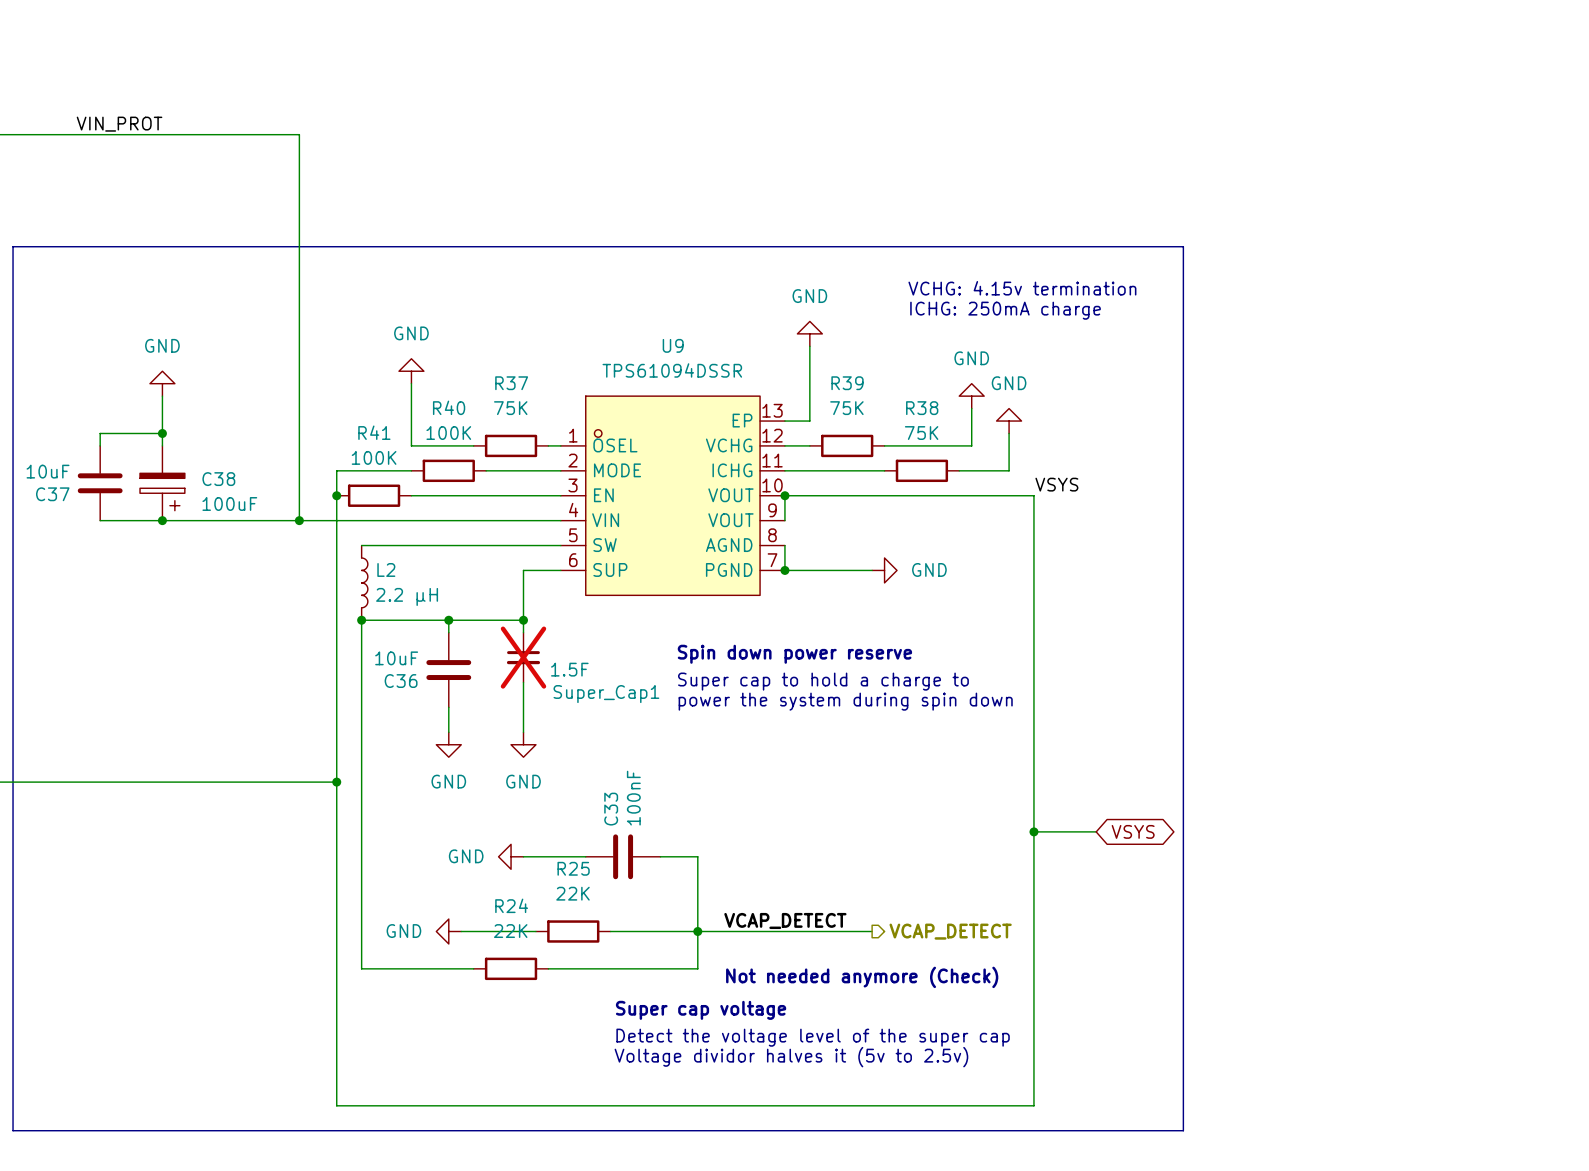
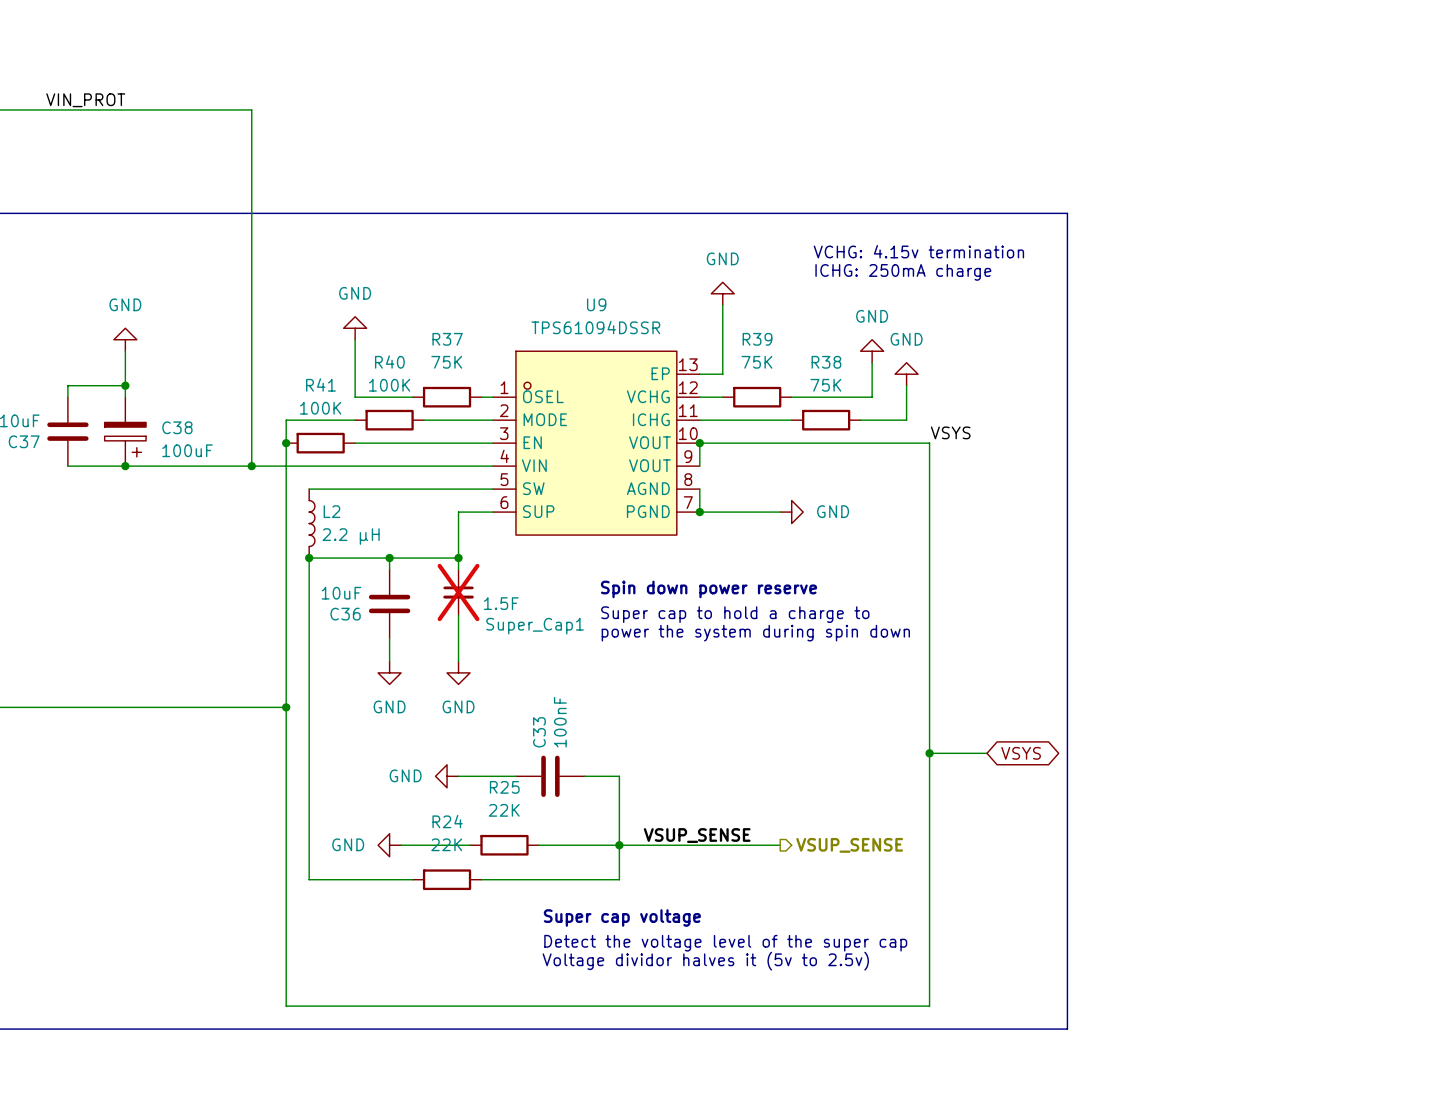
label: VCAP_DETECT (785, 920) -> VSUP_SENSE (697, 835)
hierarchical label: VCAP_DETECT (950, 931) -> VSUP_SENSE (849, 845)
text: Not needed anymore (Check) (862, 977) -> none

